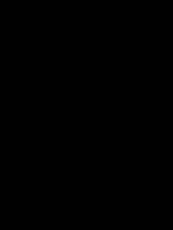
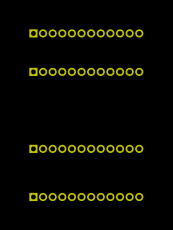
part: none -> (86, 33)
part: none -> (86, 71)
part: none -> (86, 148)
part: none -> (86, 196)

